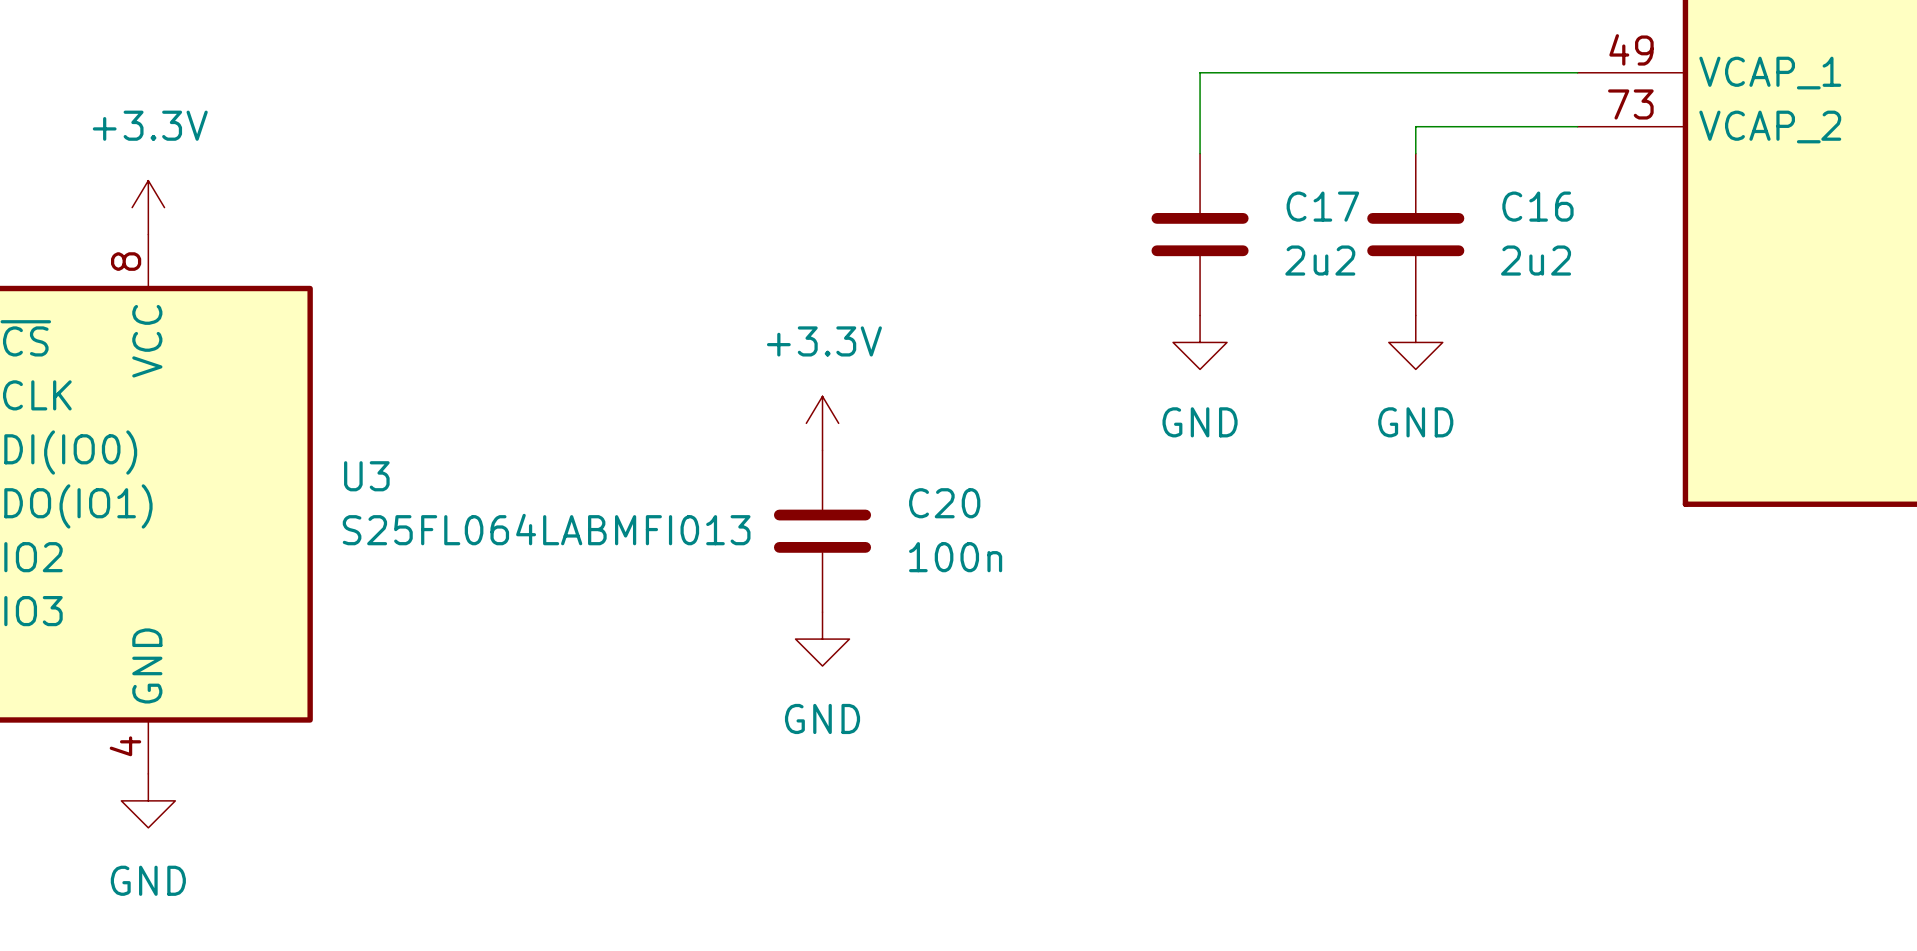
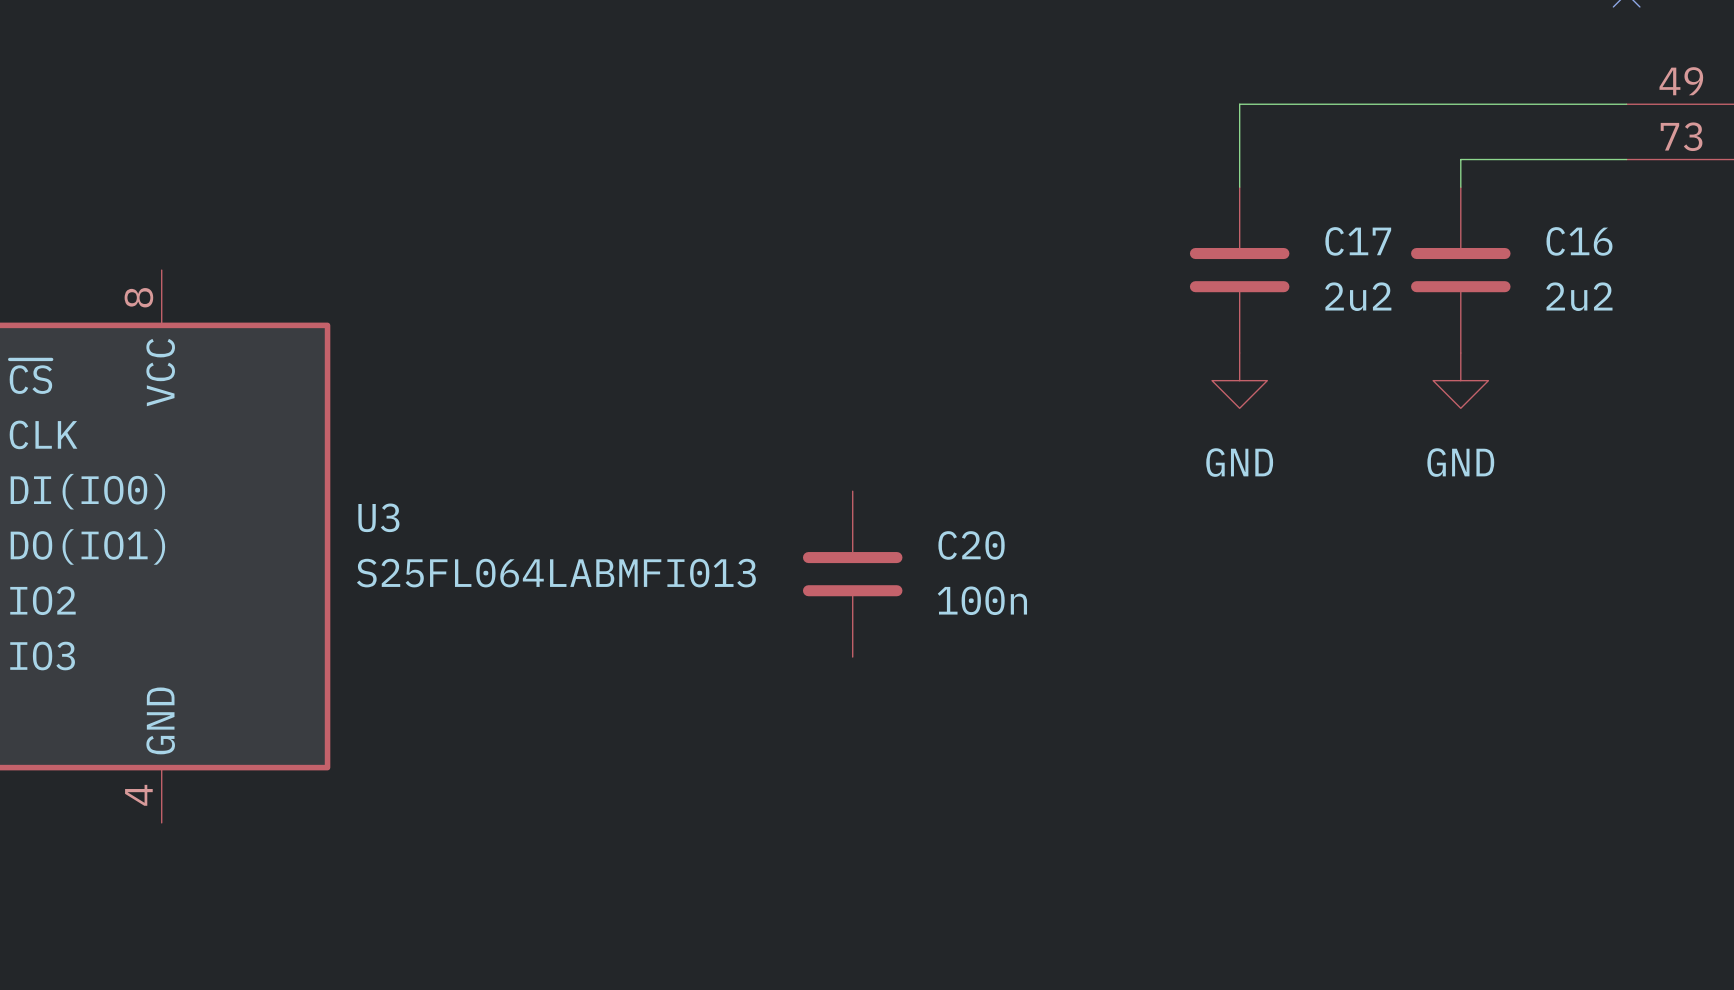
power symbol: +3.3V (148, 207) -> none
power symbol: +3.3V (822, 423) -> none
power symbol: GND (822, 639) -> none
power symbol: GND (148, 800) -> none

